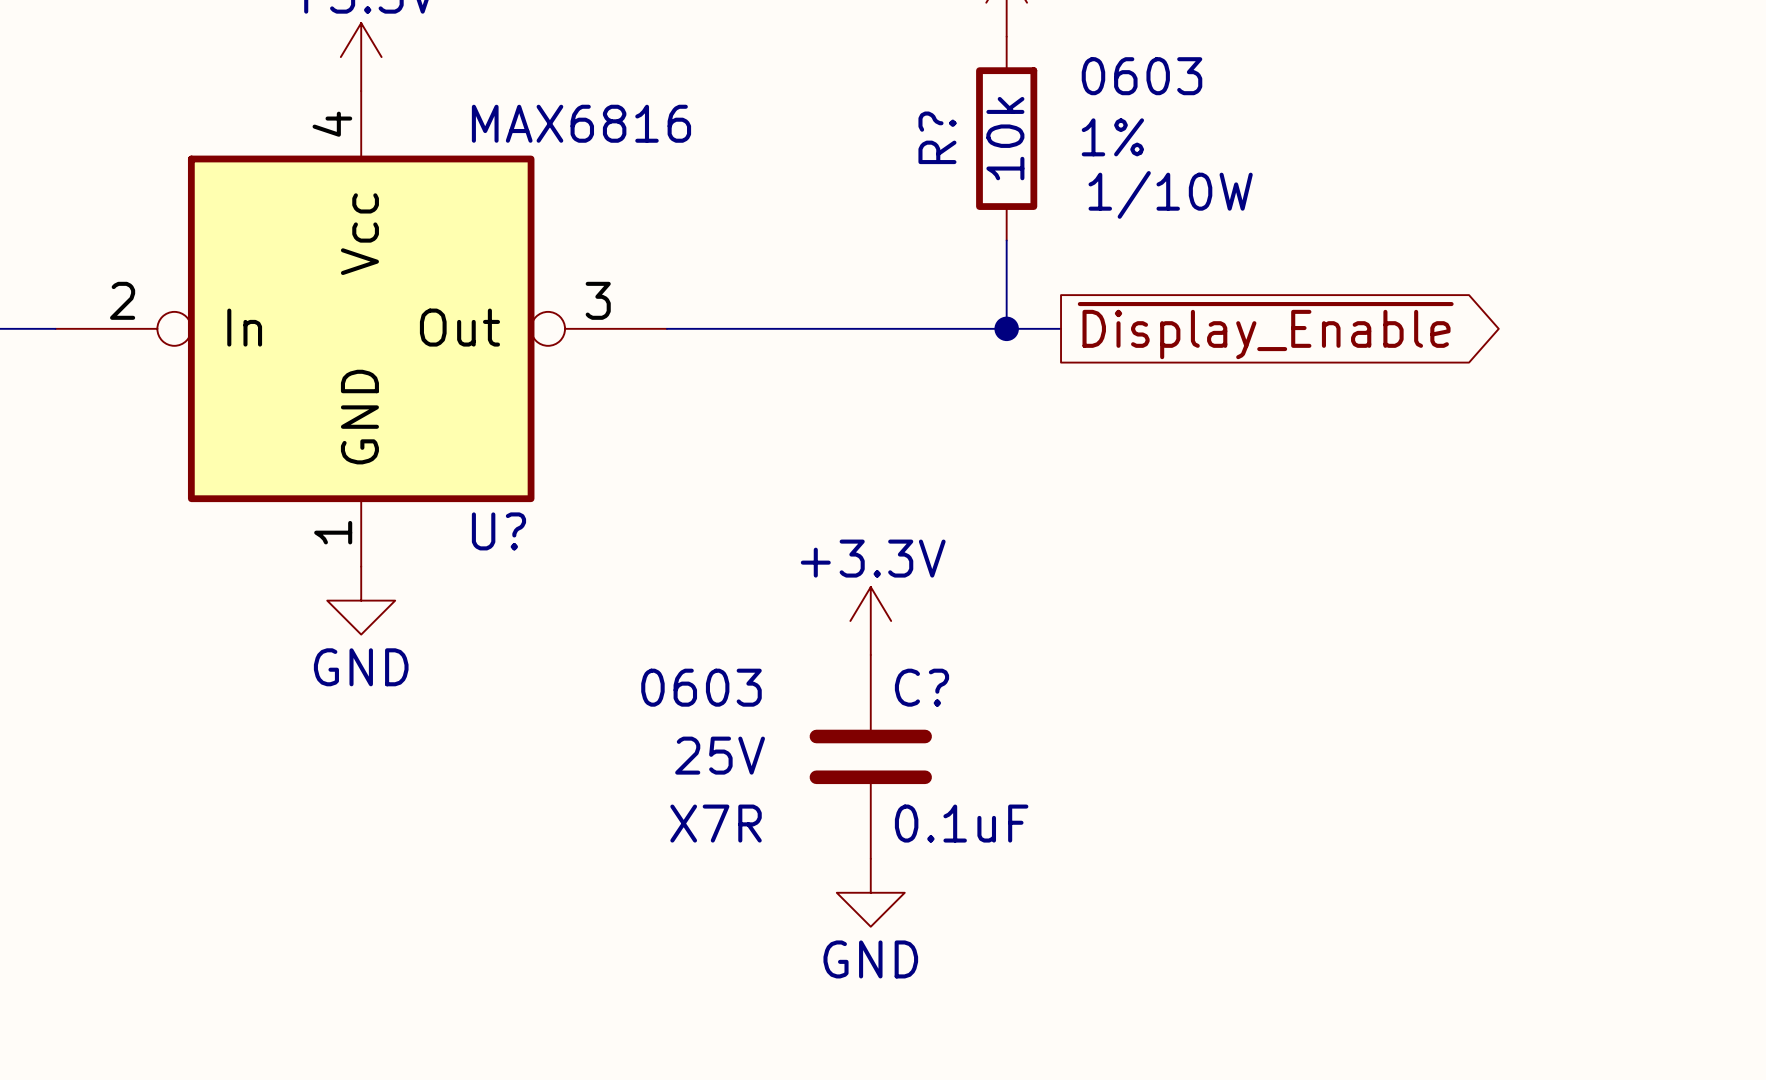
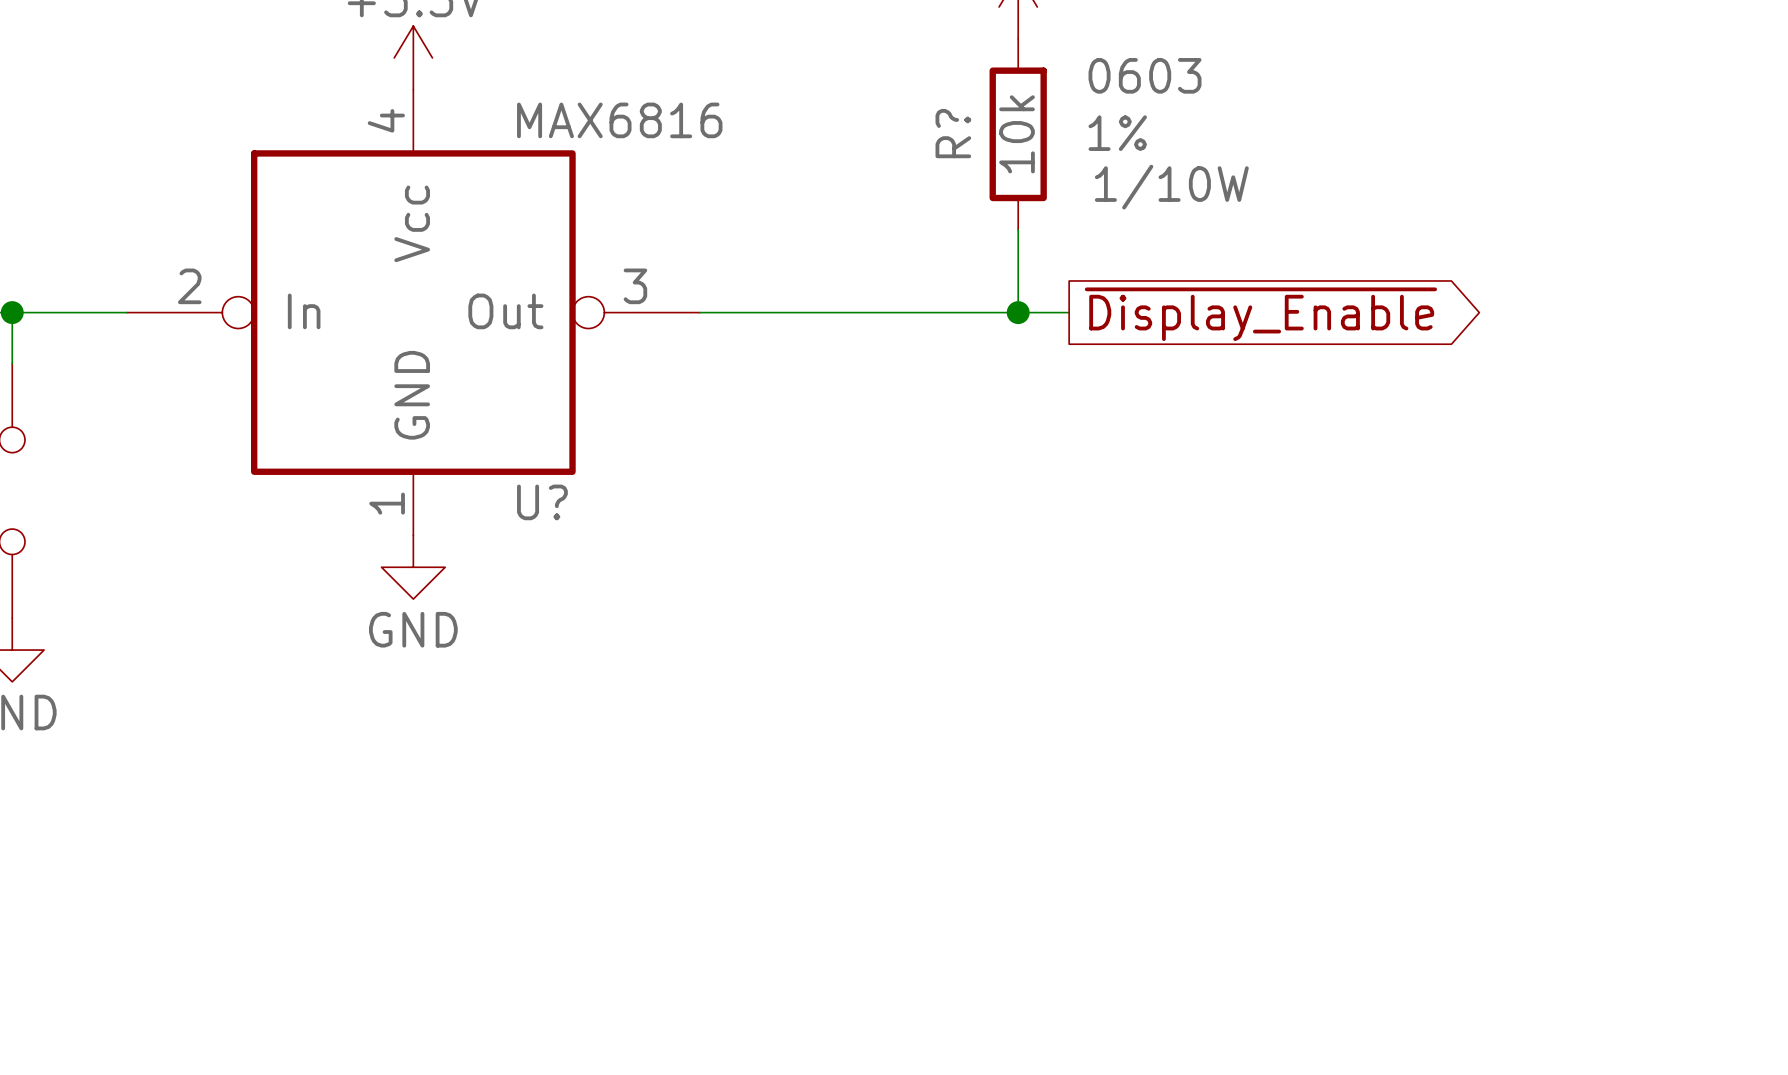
power symbol: +3.3V (870, 621) -> none
C?: 0.1uF (870, 756) -> none
power symbol: GND (870, 892) -> none

